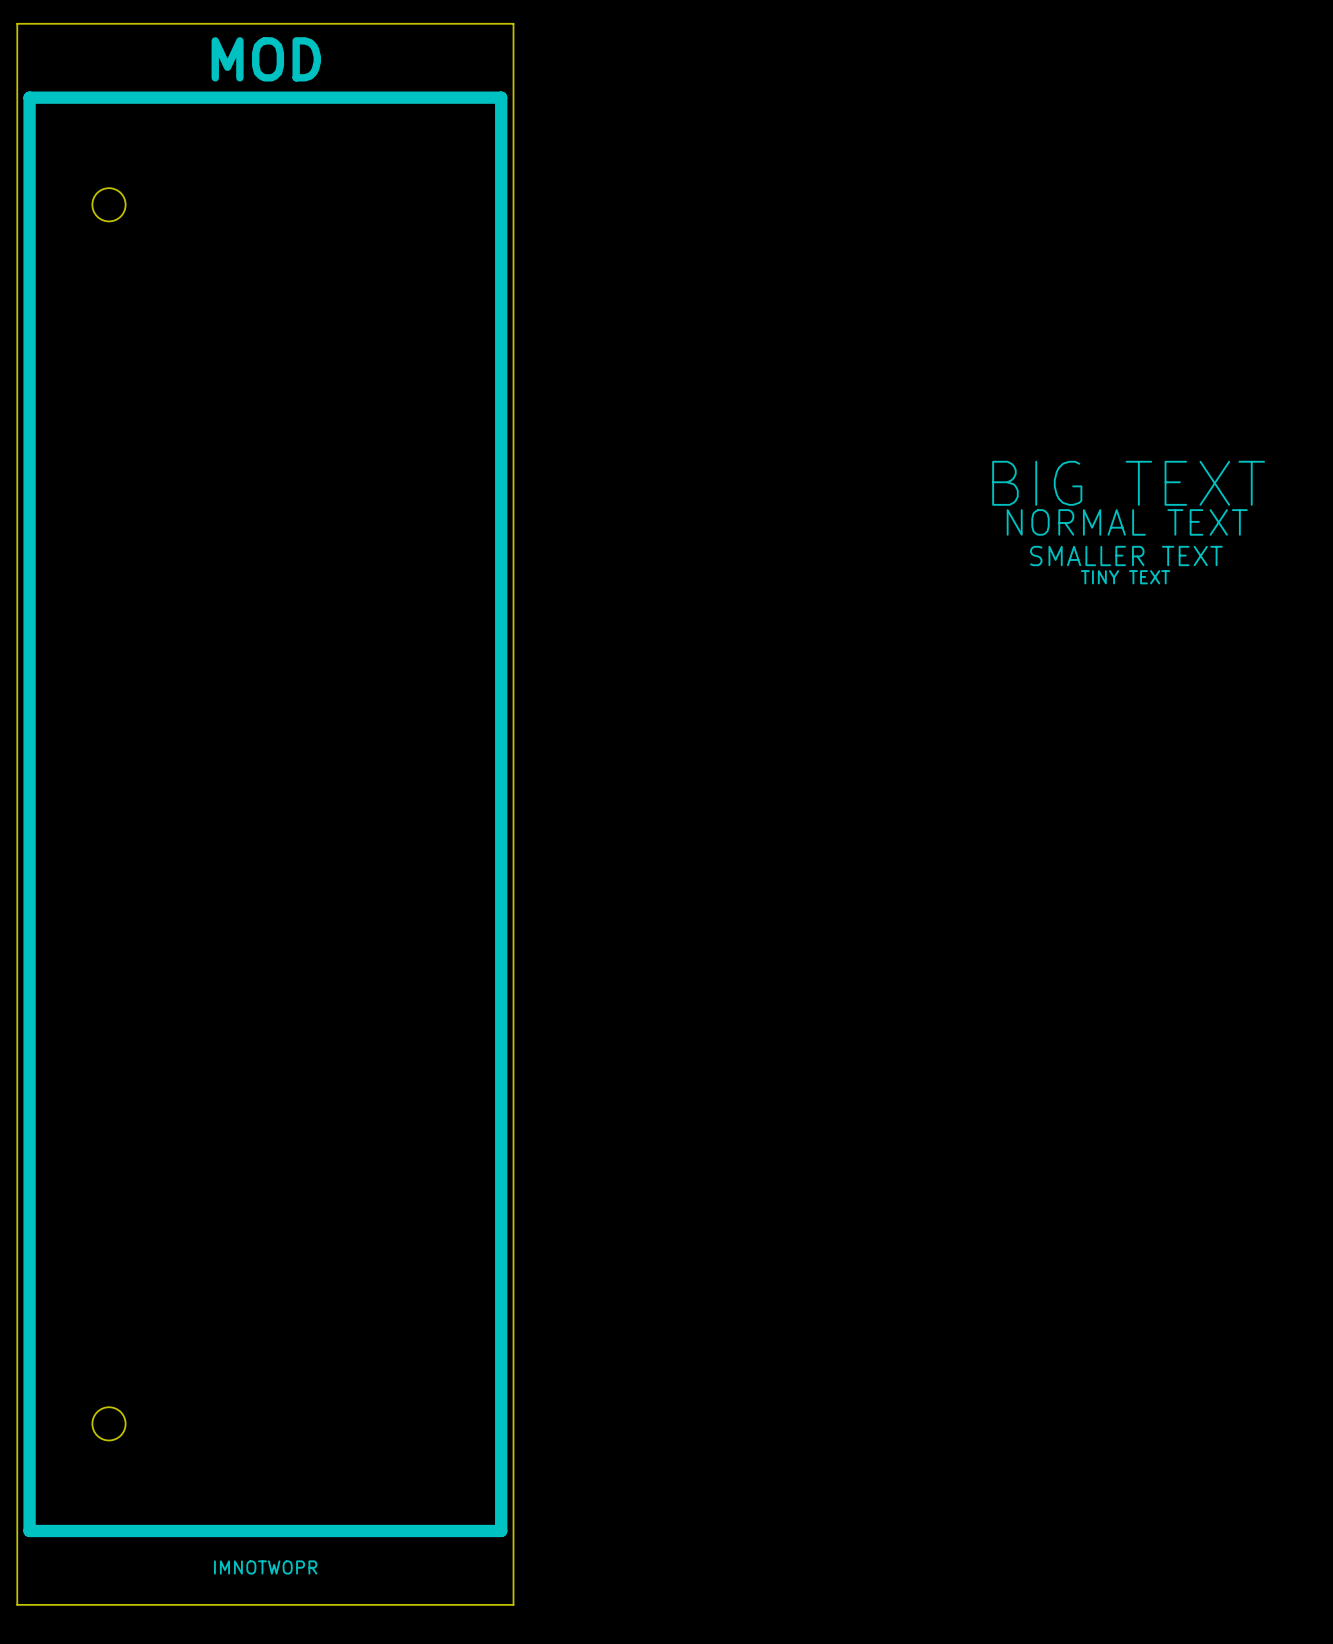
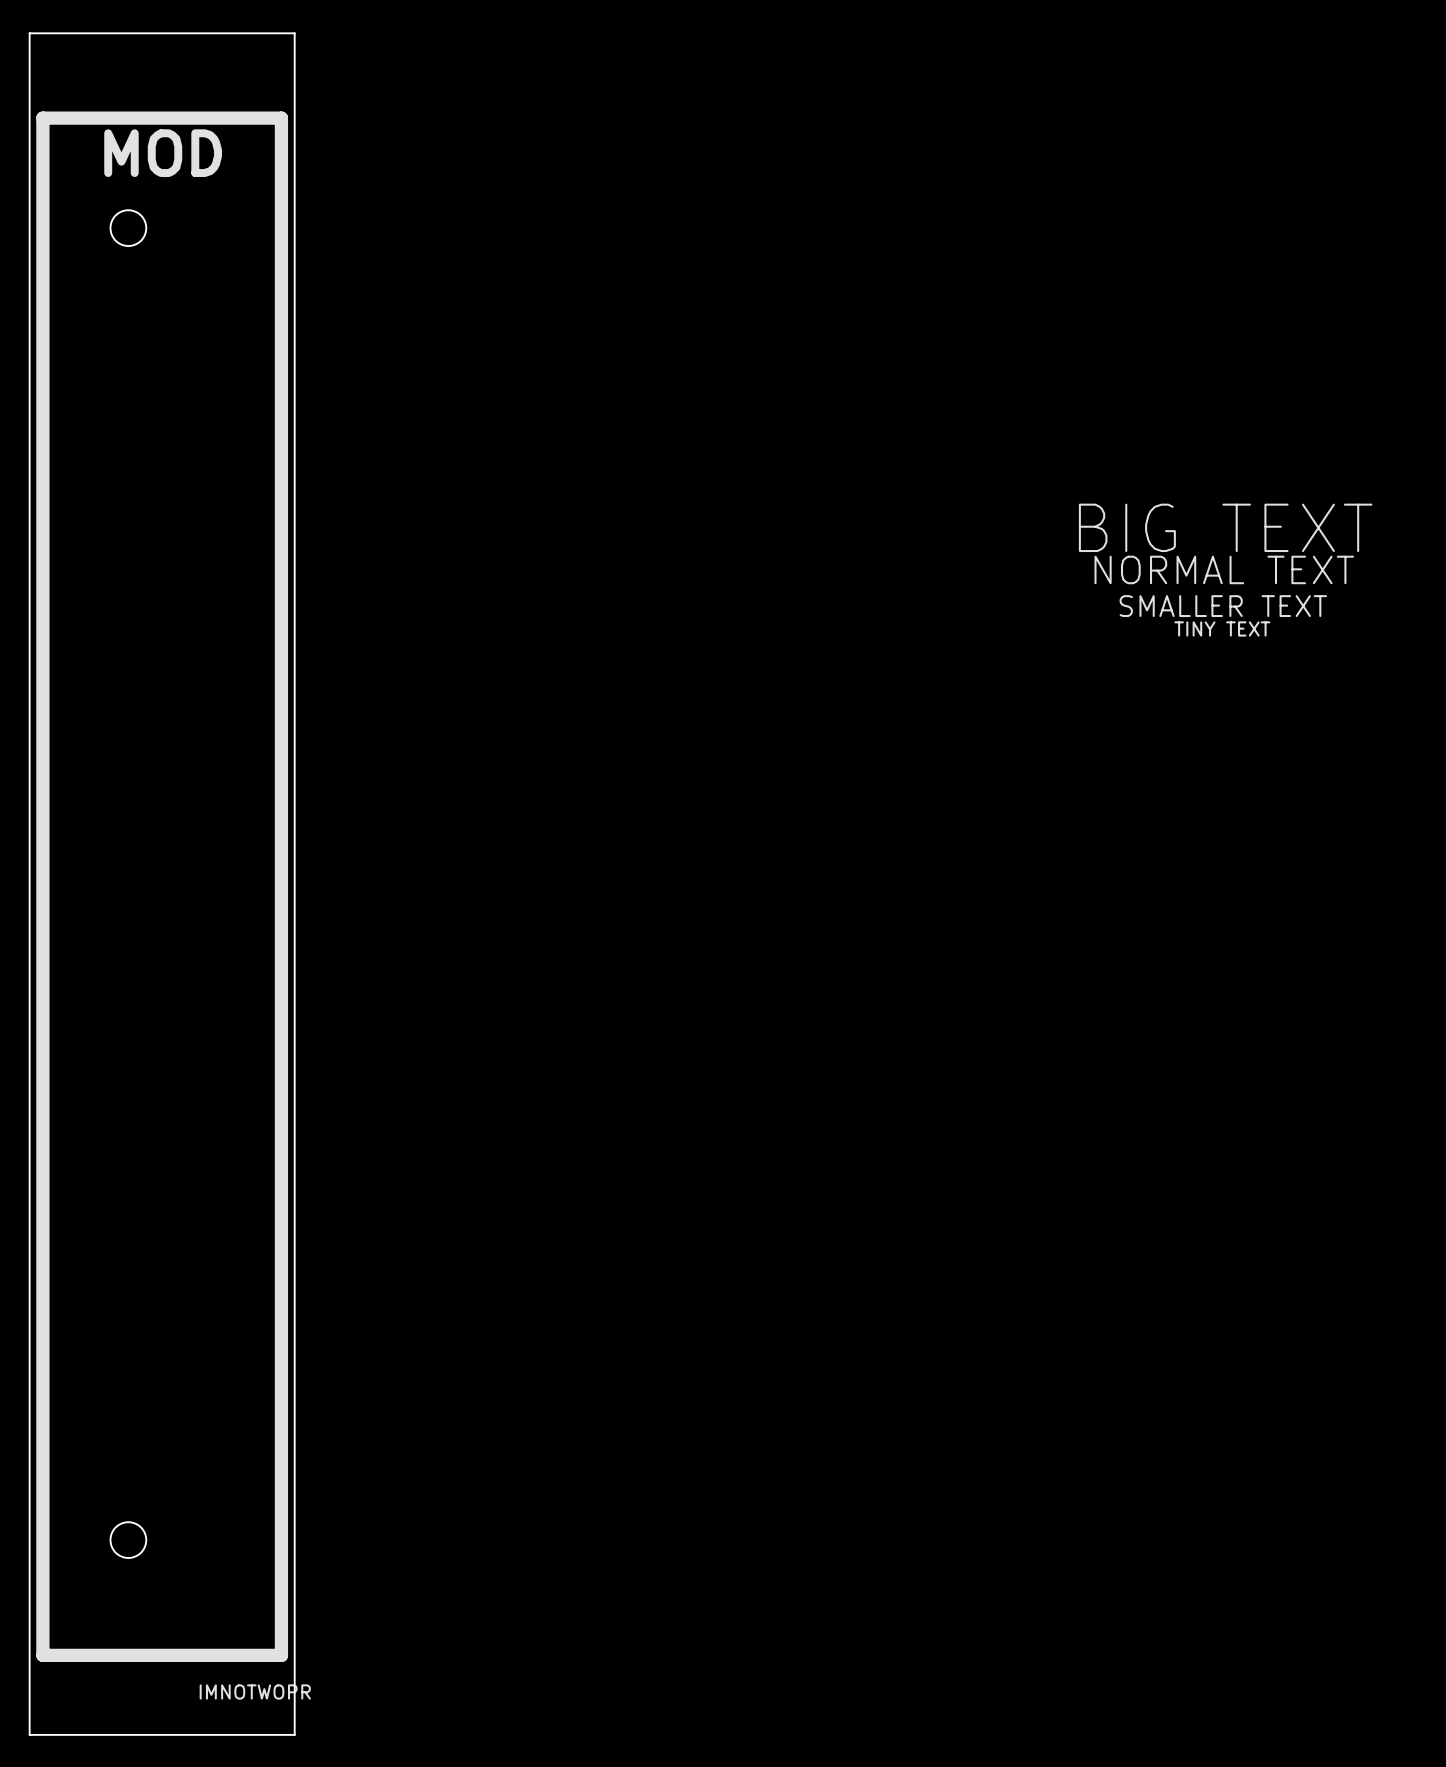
board edge: (263, 23) (513, 23) (513, 1604) (263, 1604) -> (294, 33) (294, 1734)
text position: MOD (266, 59) -> MOD (163, 153)
line: (29, 102) (29, 97) (501, 97) (501, 1530) (251, 1530) -> (42, 118) (281, 118) (281, 1655)
text position: IMNOTWOPR (265, 1567) -> IMNOTWOPR (255, 1691)

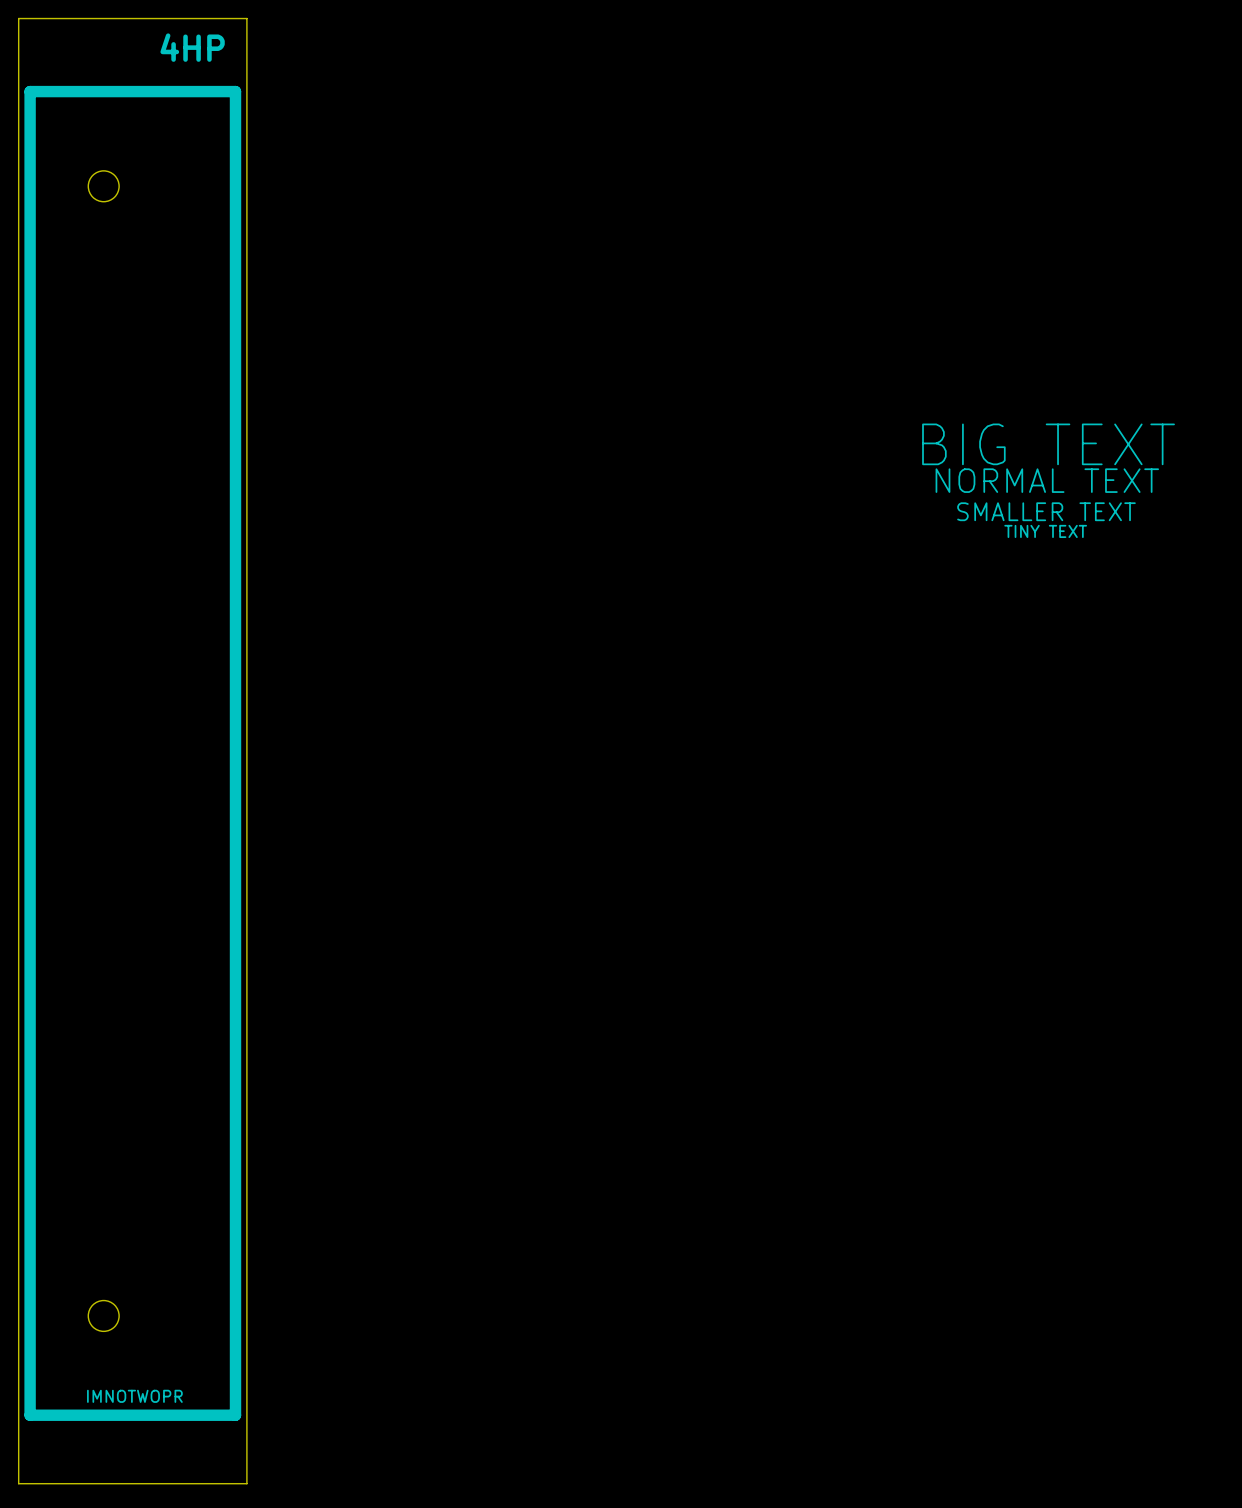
text: none -> 4HP (192, 47)
text: MOD (163, 153) -> none
text position: IMNOTWOPR (255, 1691) -> IMNOTWOPR (134, 1396)

